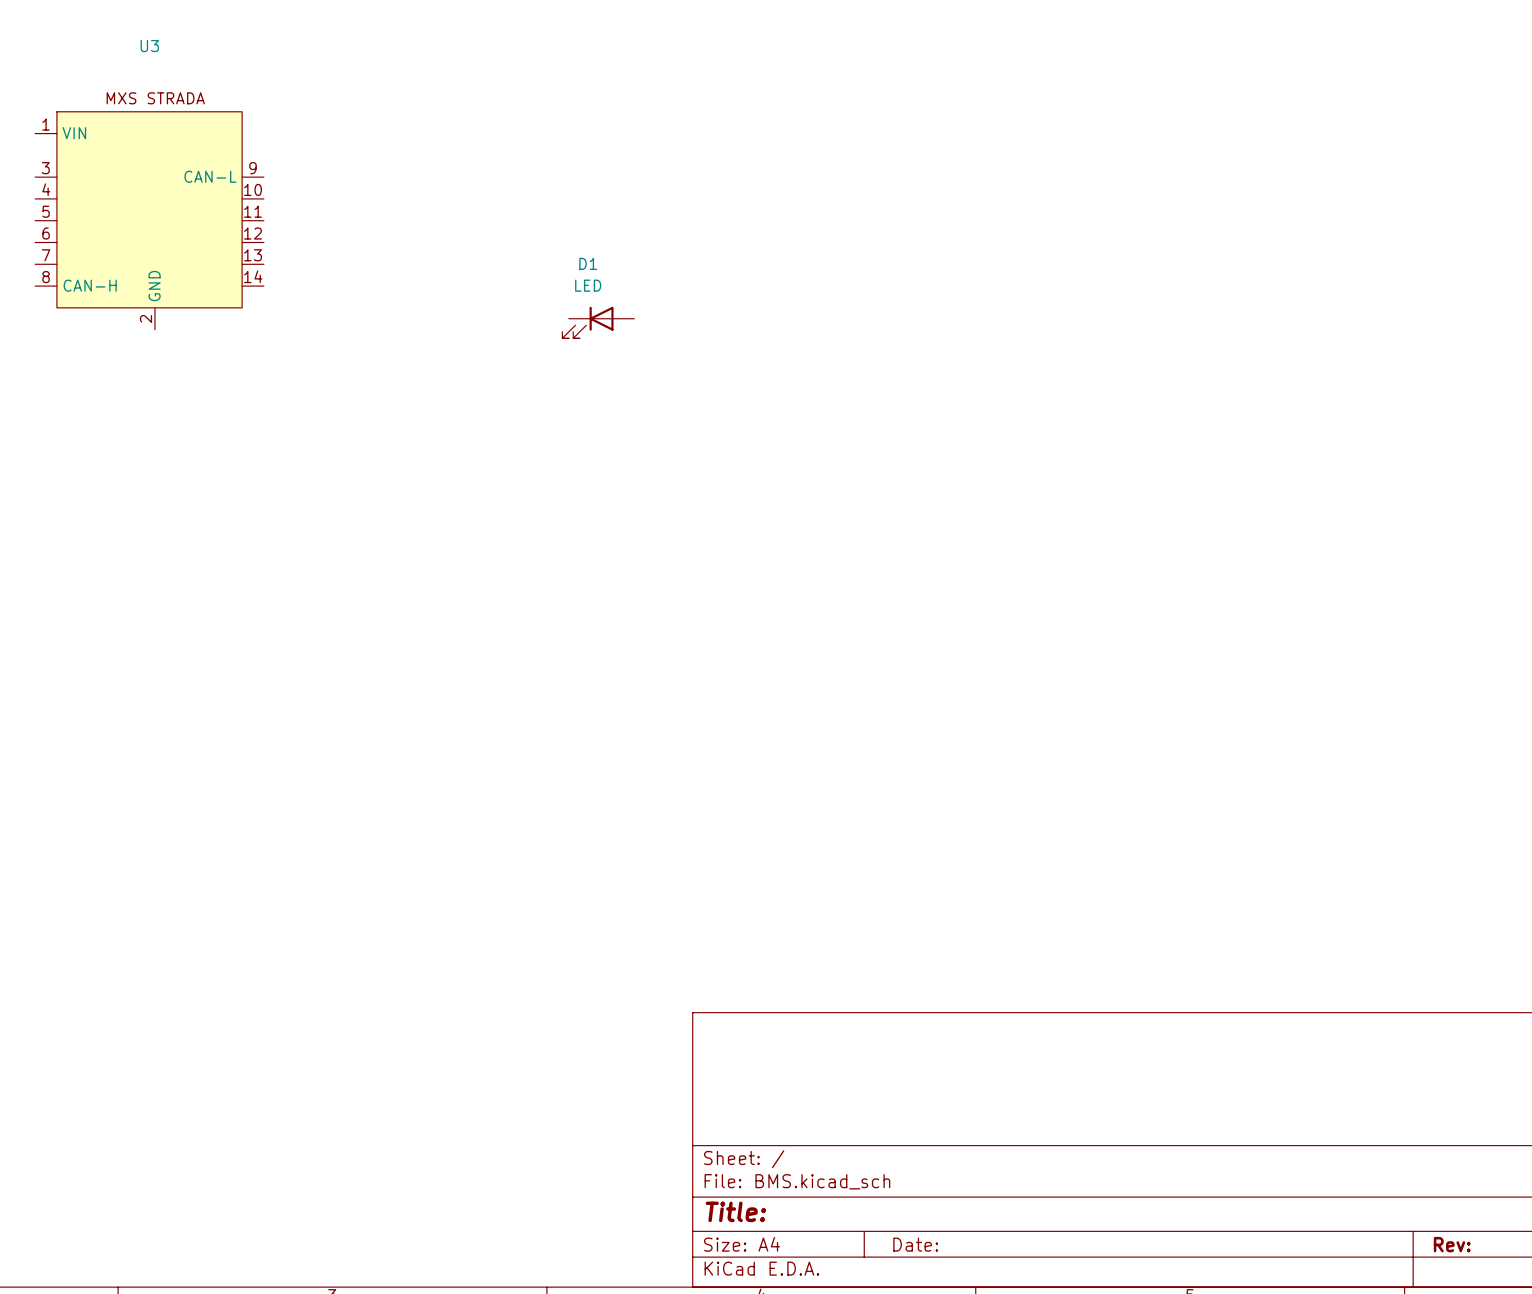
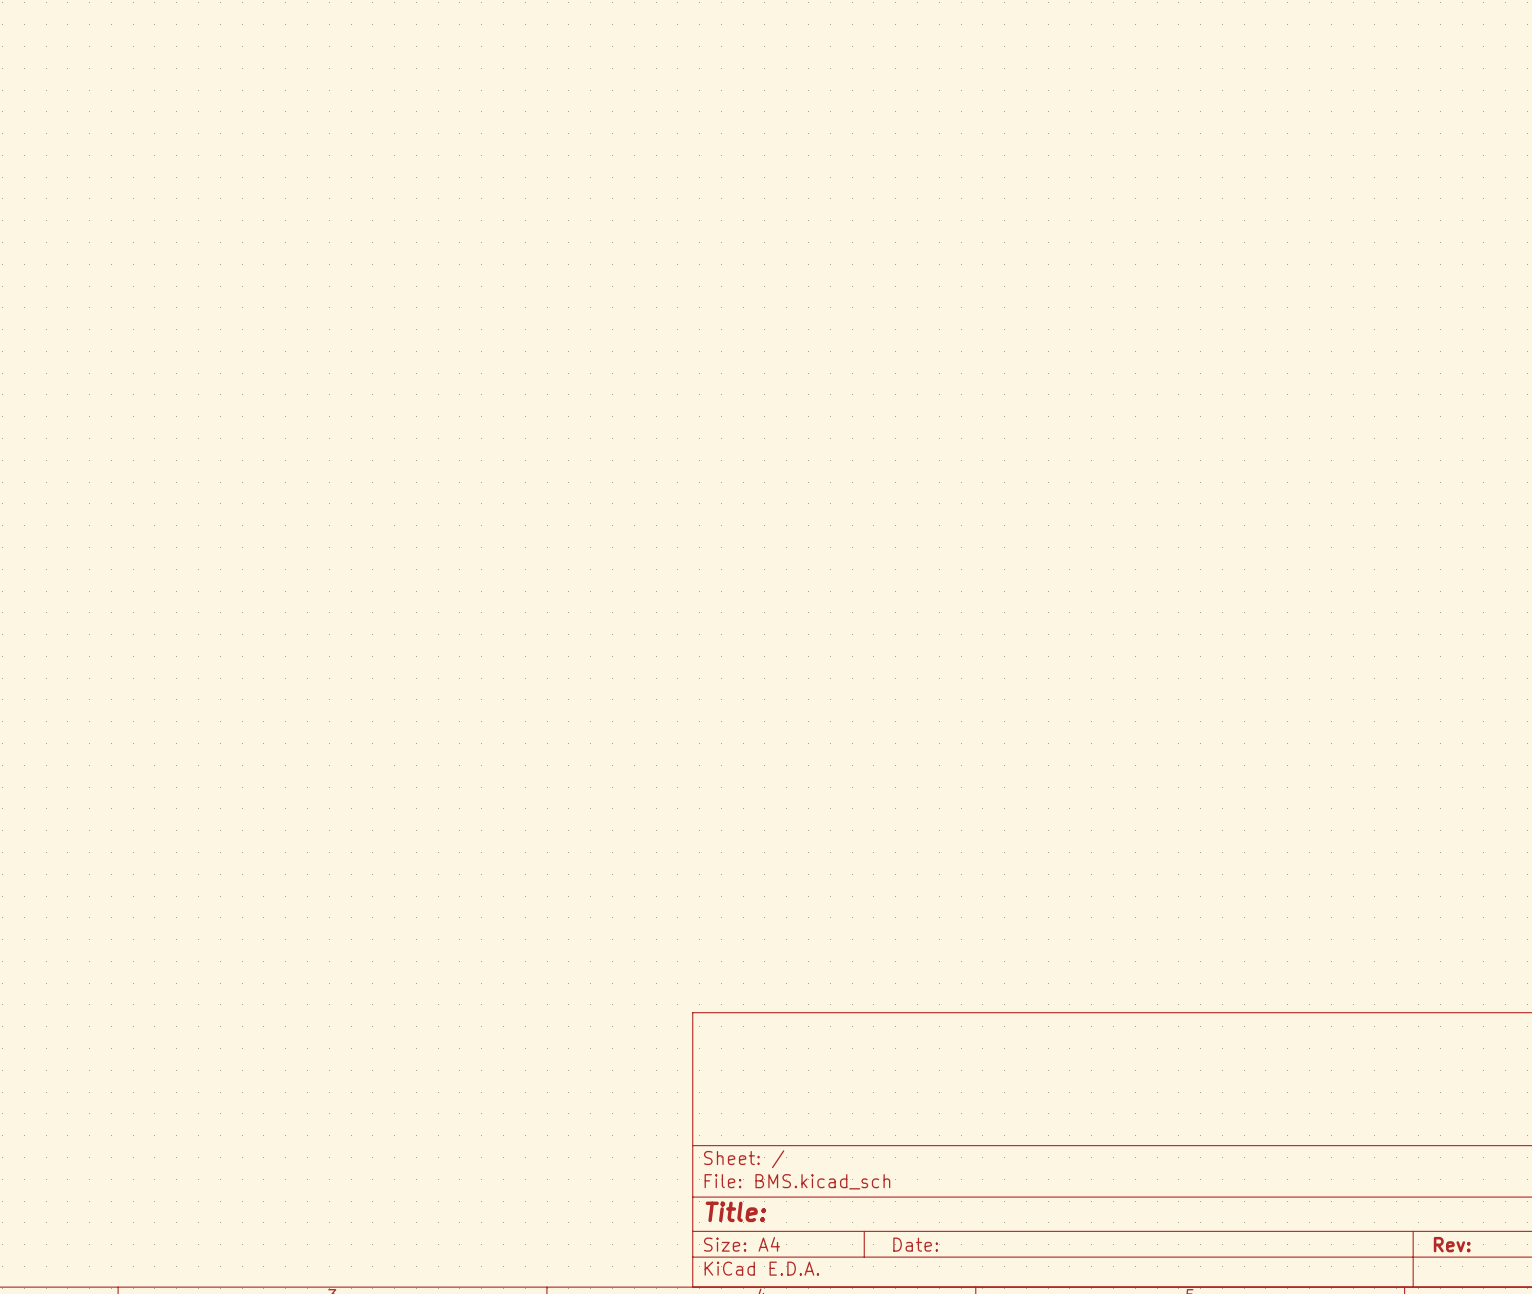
U3: (149, 220) -> none
D1: LED (598, 322) -> none

